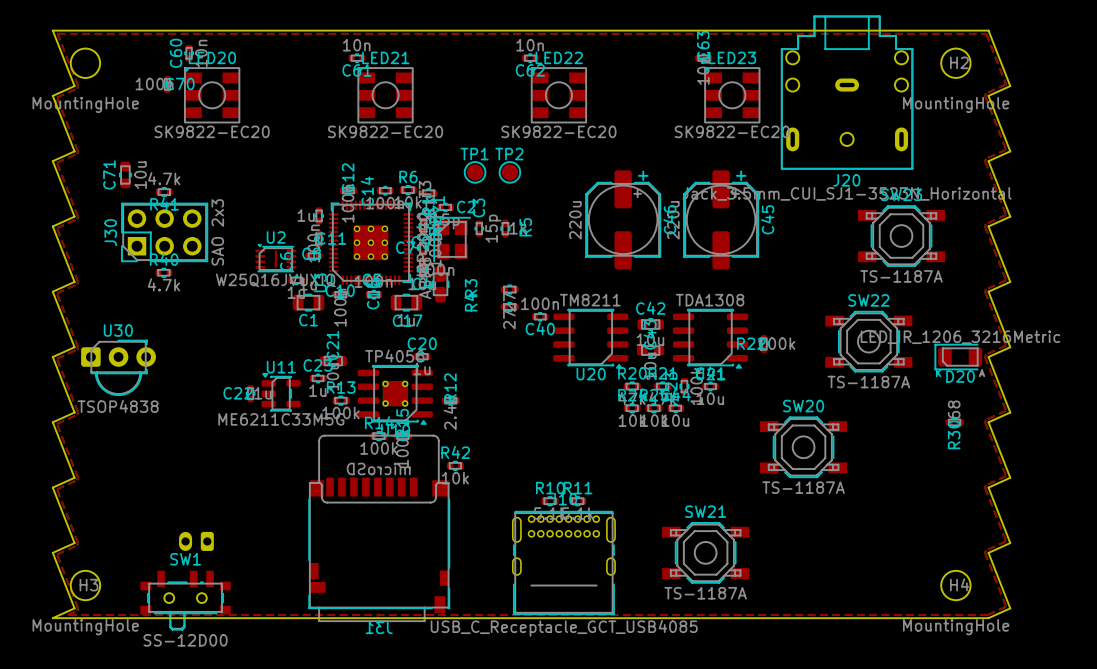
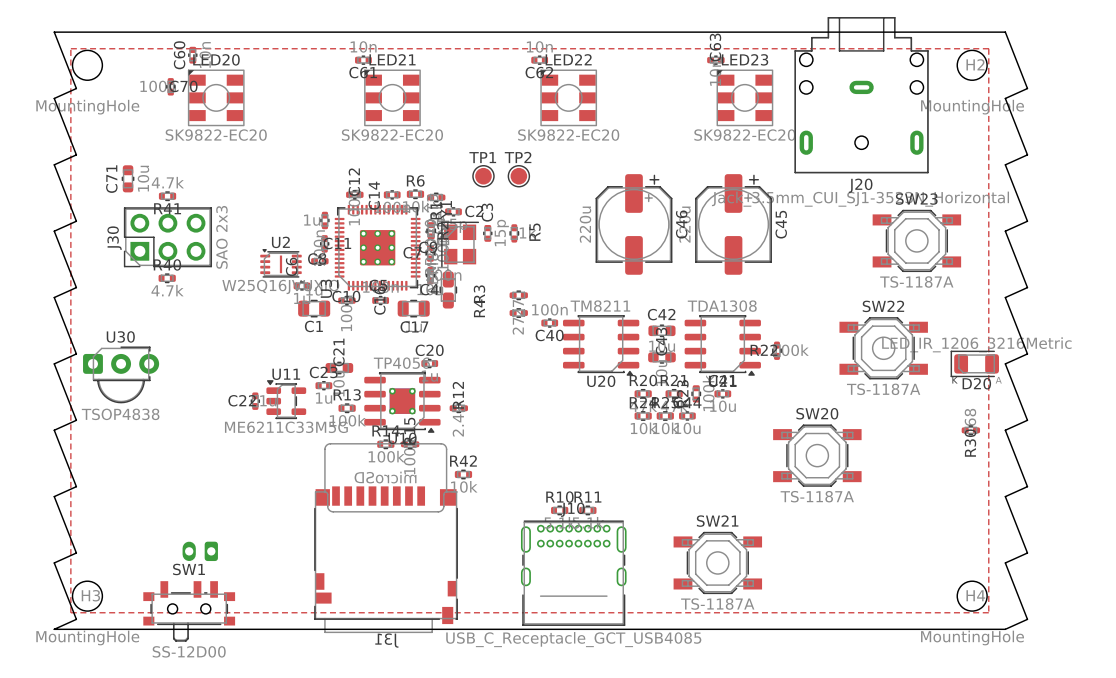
top zone outline: (57, 33) (78, 86) (77, 88) (56, 97) (78, 151) (77, 153) (56, 162) (78, 216) (77, 219) (56, 228) (78, 281) (77, 284) (56, 293) (78, 347) (77, 349) (56, 358) (78, 412) (77, 414) (56, 424) (78, 477) (77, 480) (56, 489) (78, 543) (77, 545) (56, 554) (78, 608) (68, 614) (987, 614) (1006, 606) (985, 552) (986, 550) (1006, 541) (985, 487) (986, 485) (1006, 476) (985, 422) (986, 419) (1006, 410) (985, 357) (986, 354) (1006, 345) (985, 291) (986, 289) (1006, 280) (985, 226) (986, 224) (1006, 214) (985, 161) (986, 158) (1006, 149) (985, 95) (986, 93) (1006, 84) (986, 33) (57, 33) -> (70, 48) (70, 612) (988, 612) (988, 48) (70, 48)

